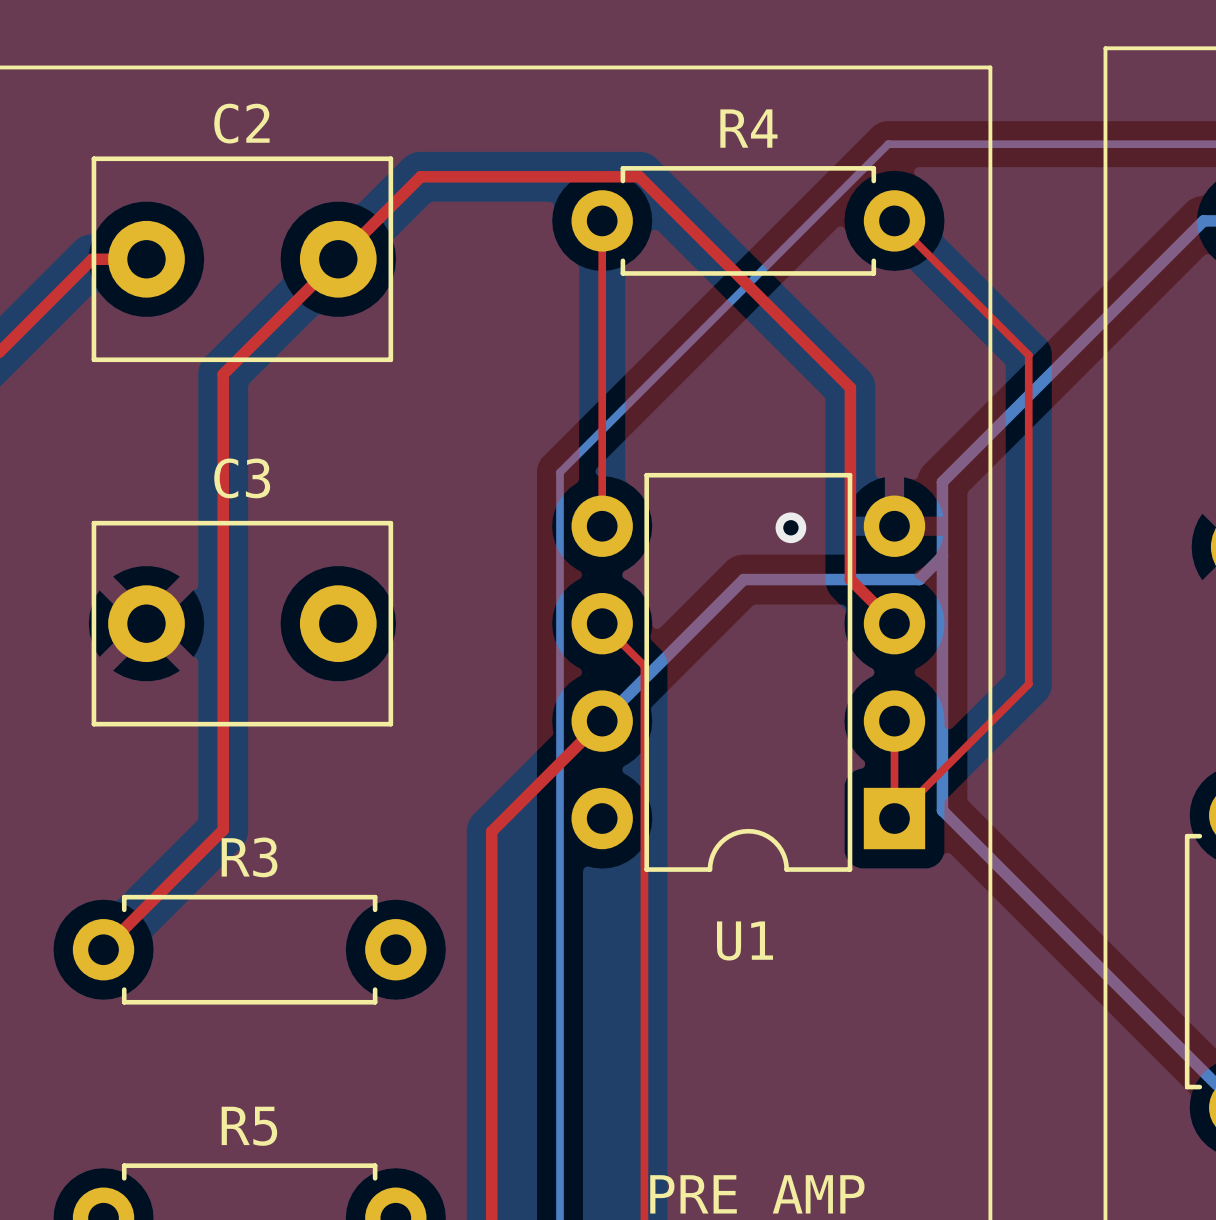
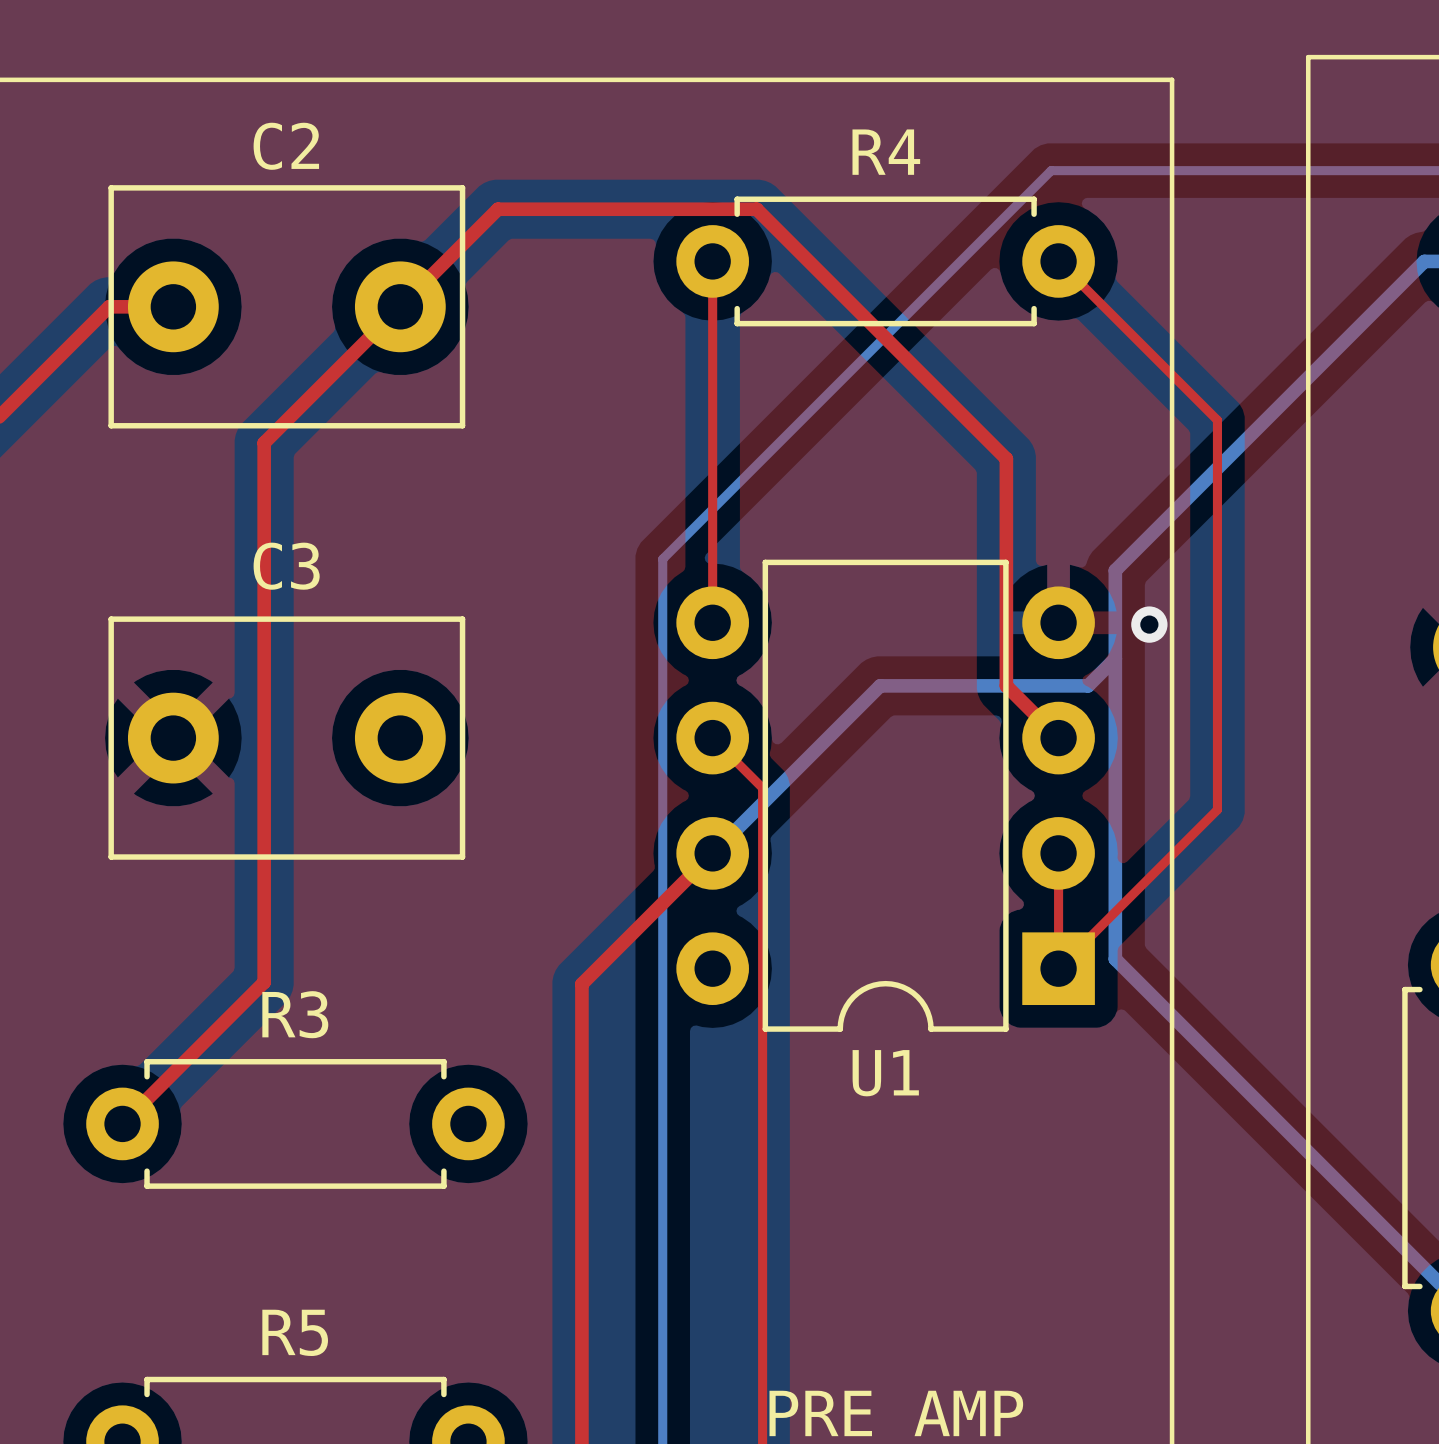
via position: (790, 527) -> (1149, 624)
U1 name position: U1 (744, 940) -> U1 (885, 1073)

